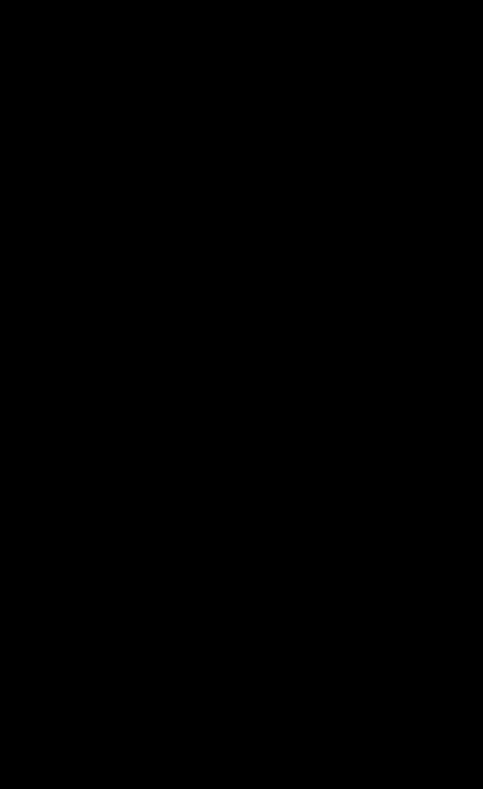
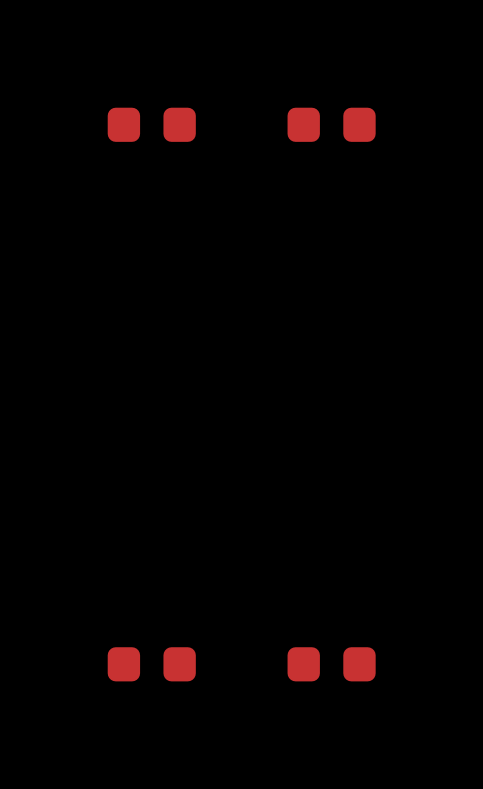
part: none -> (151, 124)
part: none -> (331, 124)
part: none -> (151, 664)
part: none -> (331, 664)

